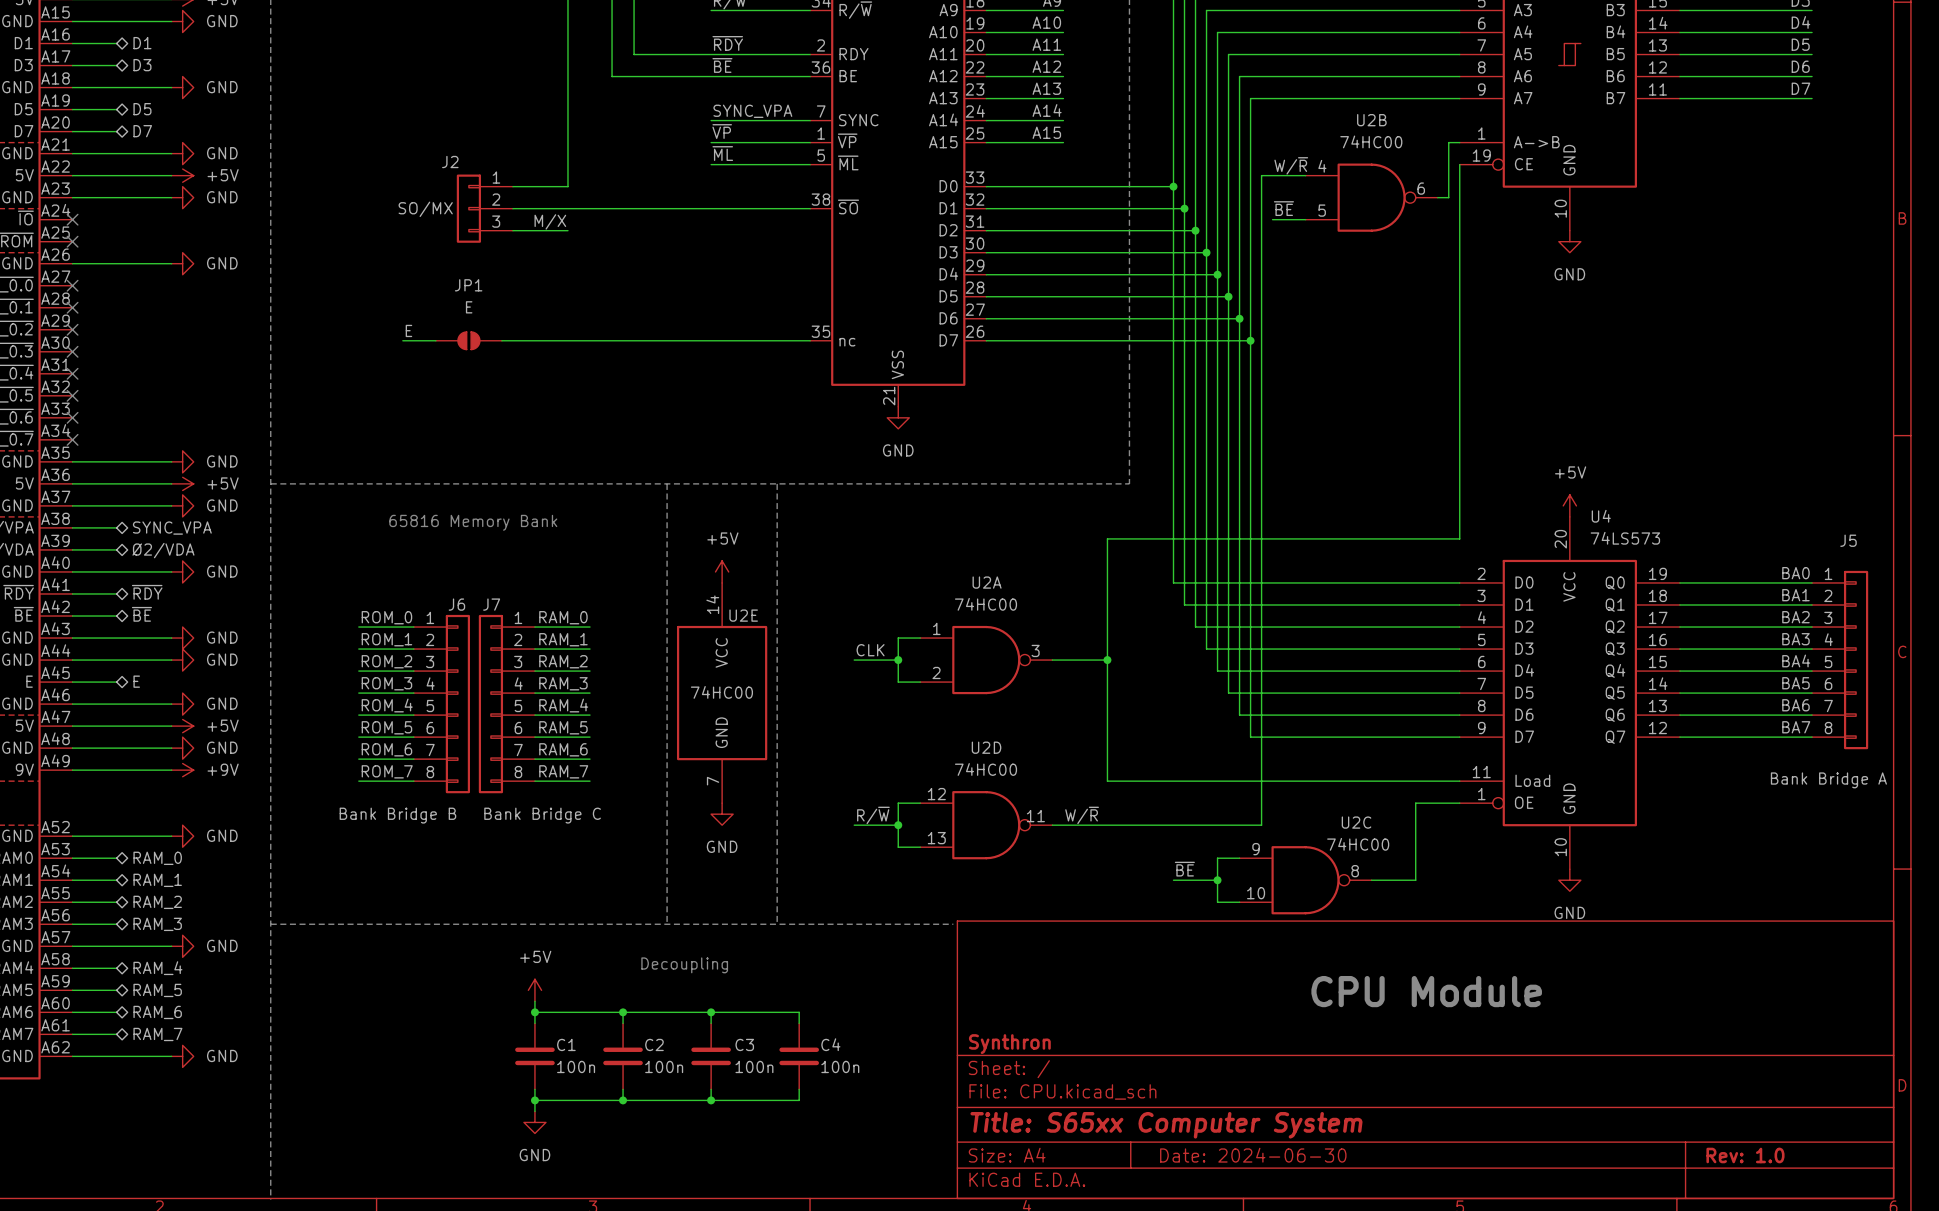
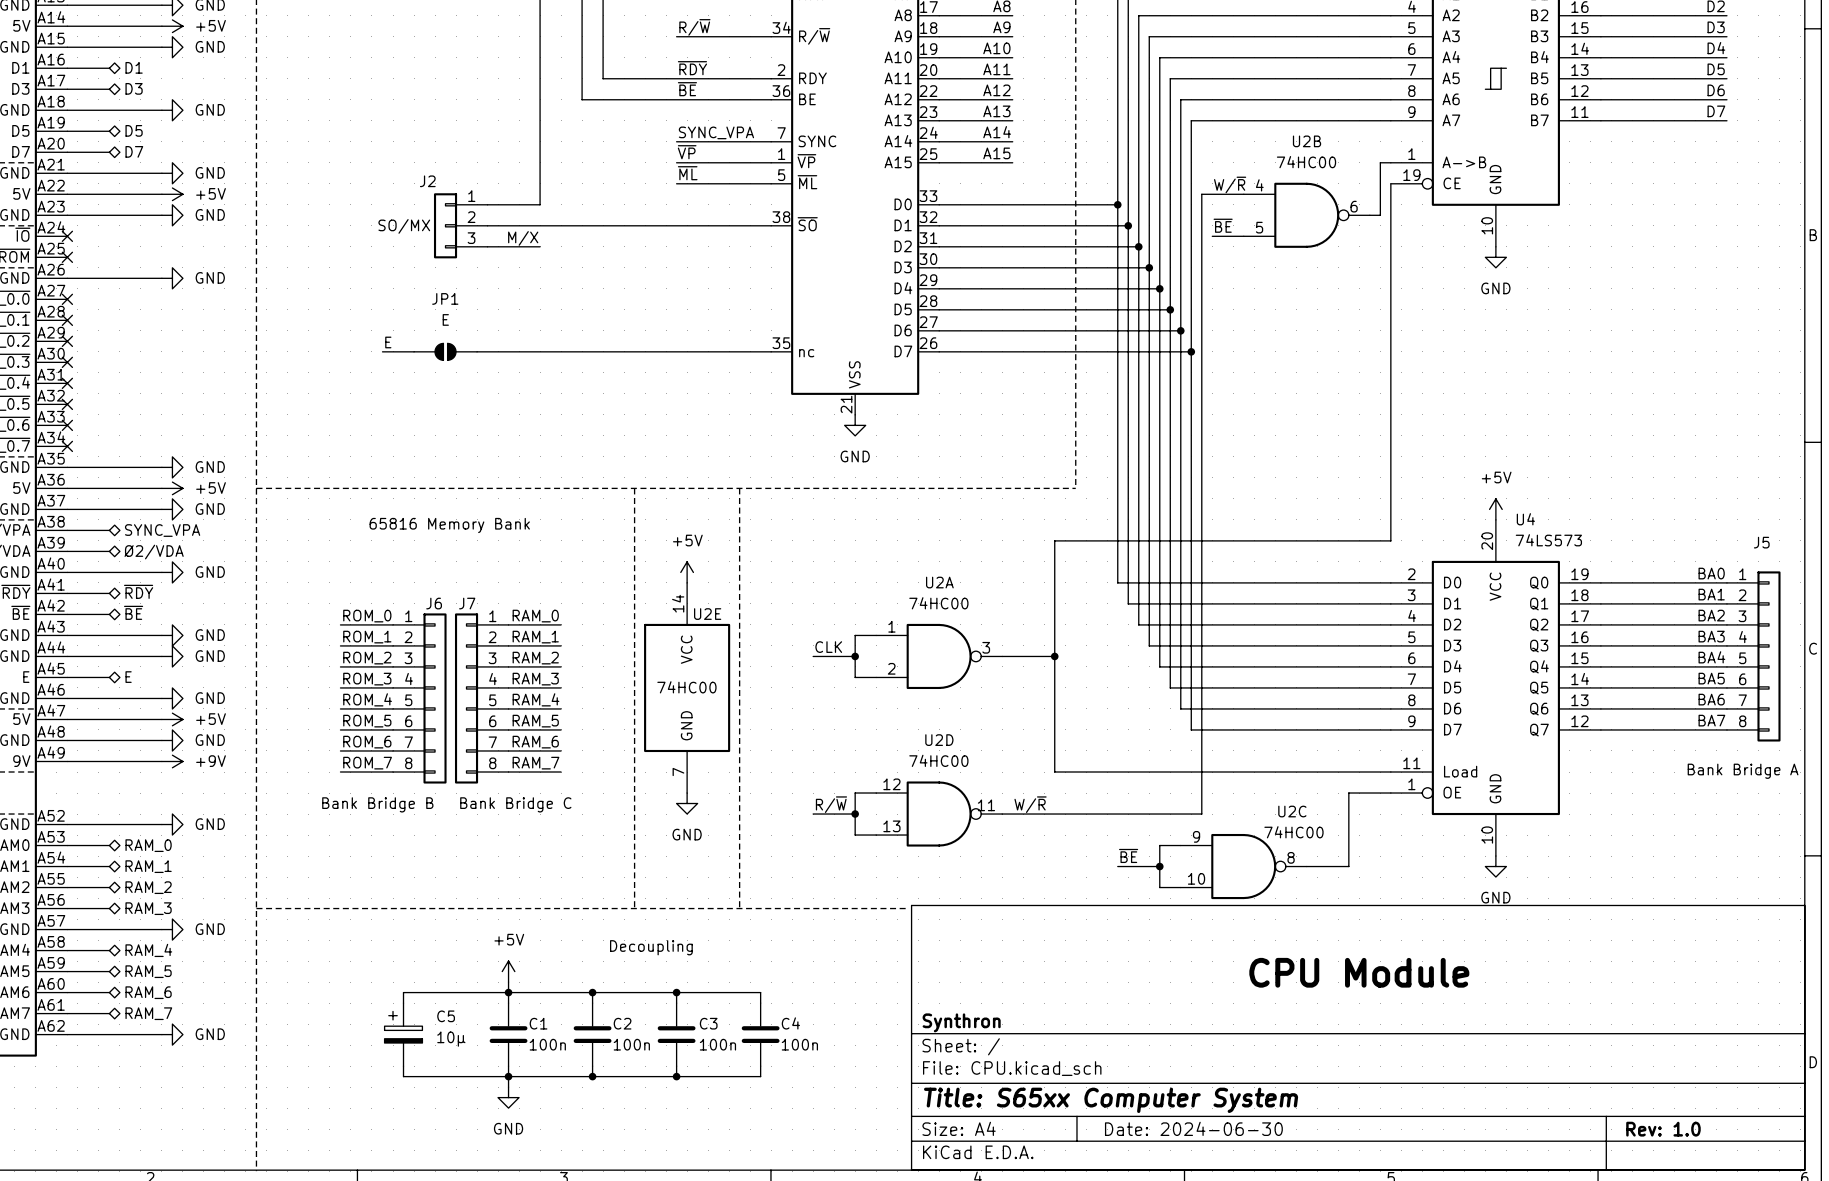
wire: none -> (508, 992) (403, 992) (403, 1003)
C5: none -> 10µ (403, 1034)
wire: none -> (403, 1066) (403, 1076) (508, 1076)

